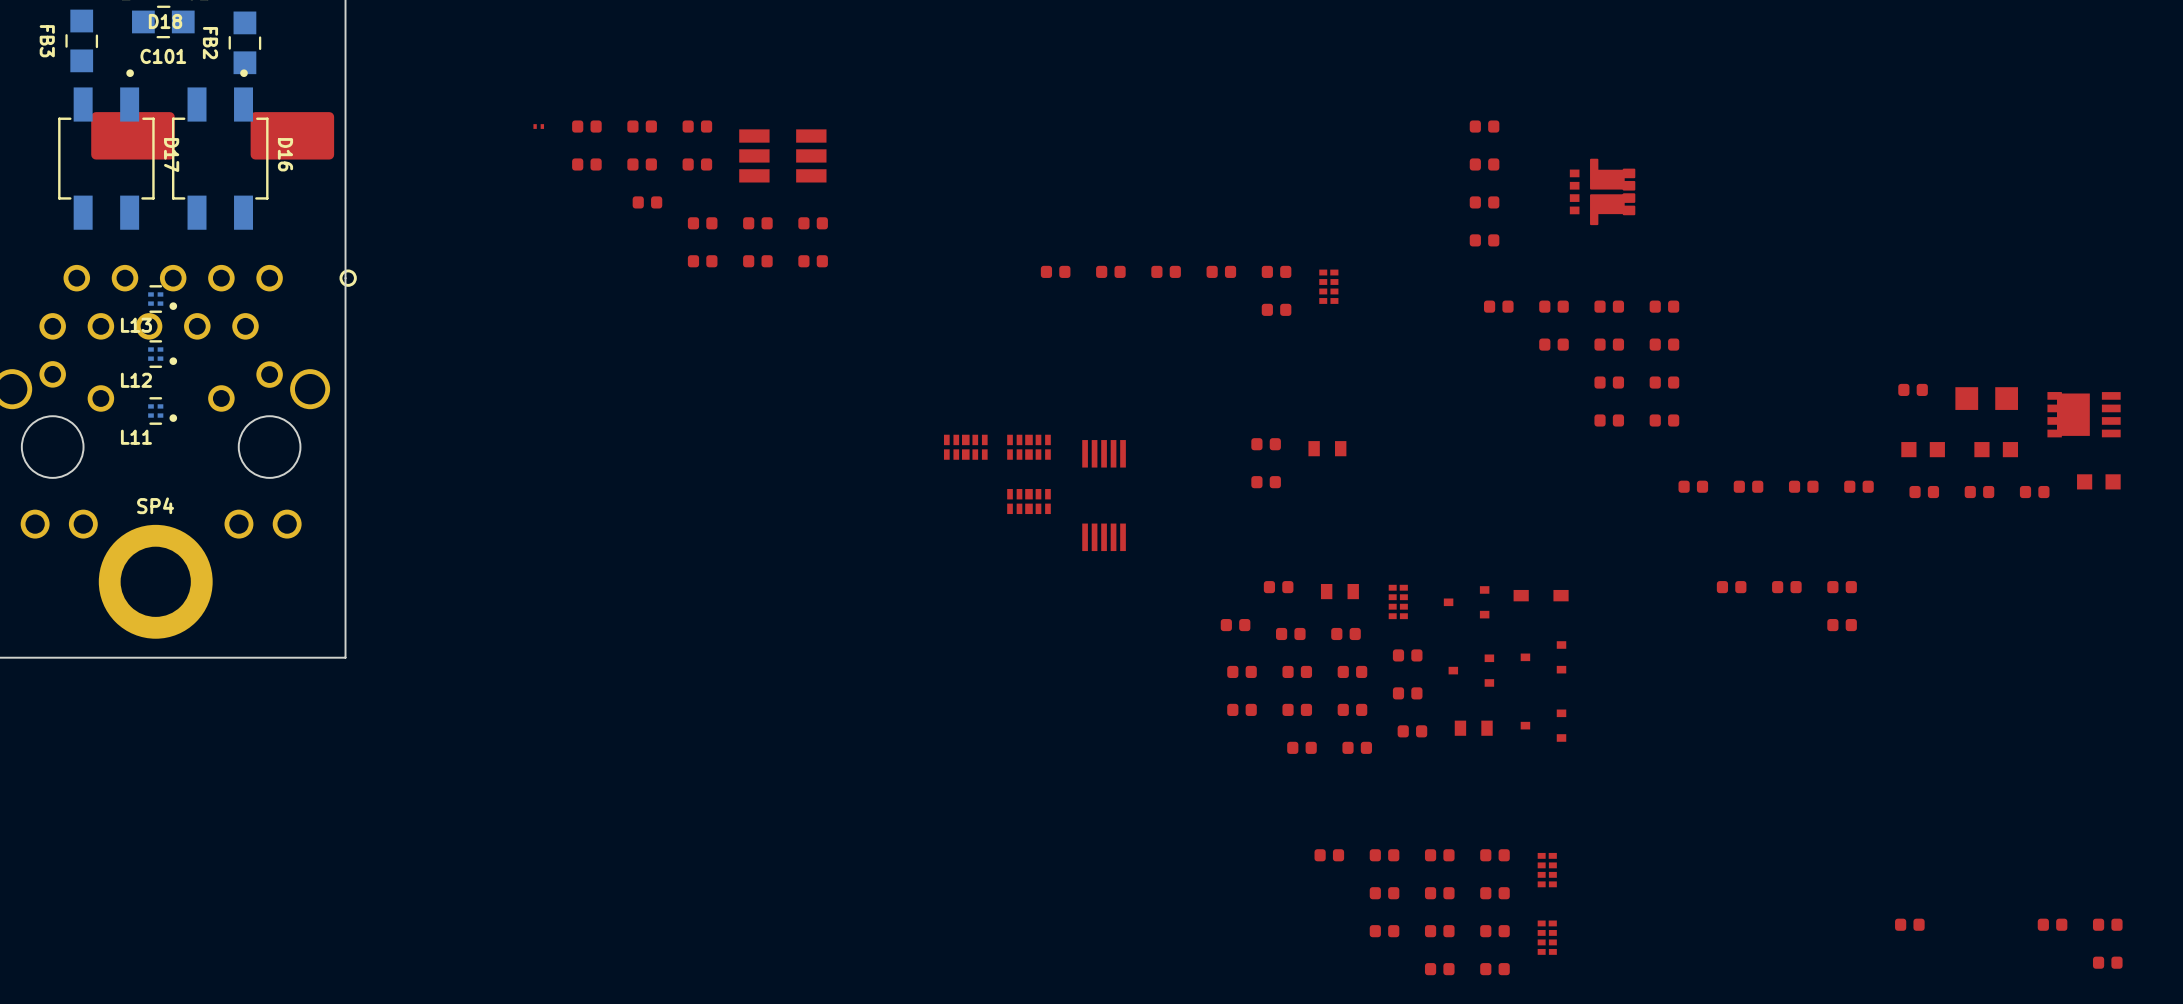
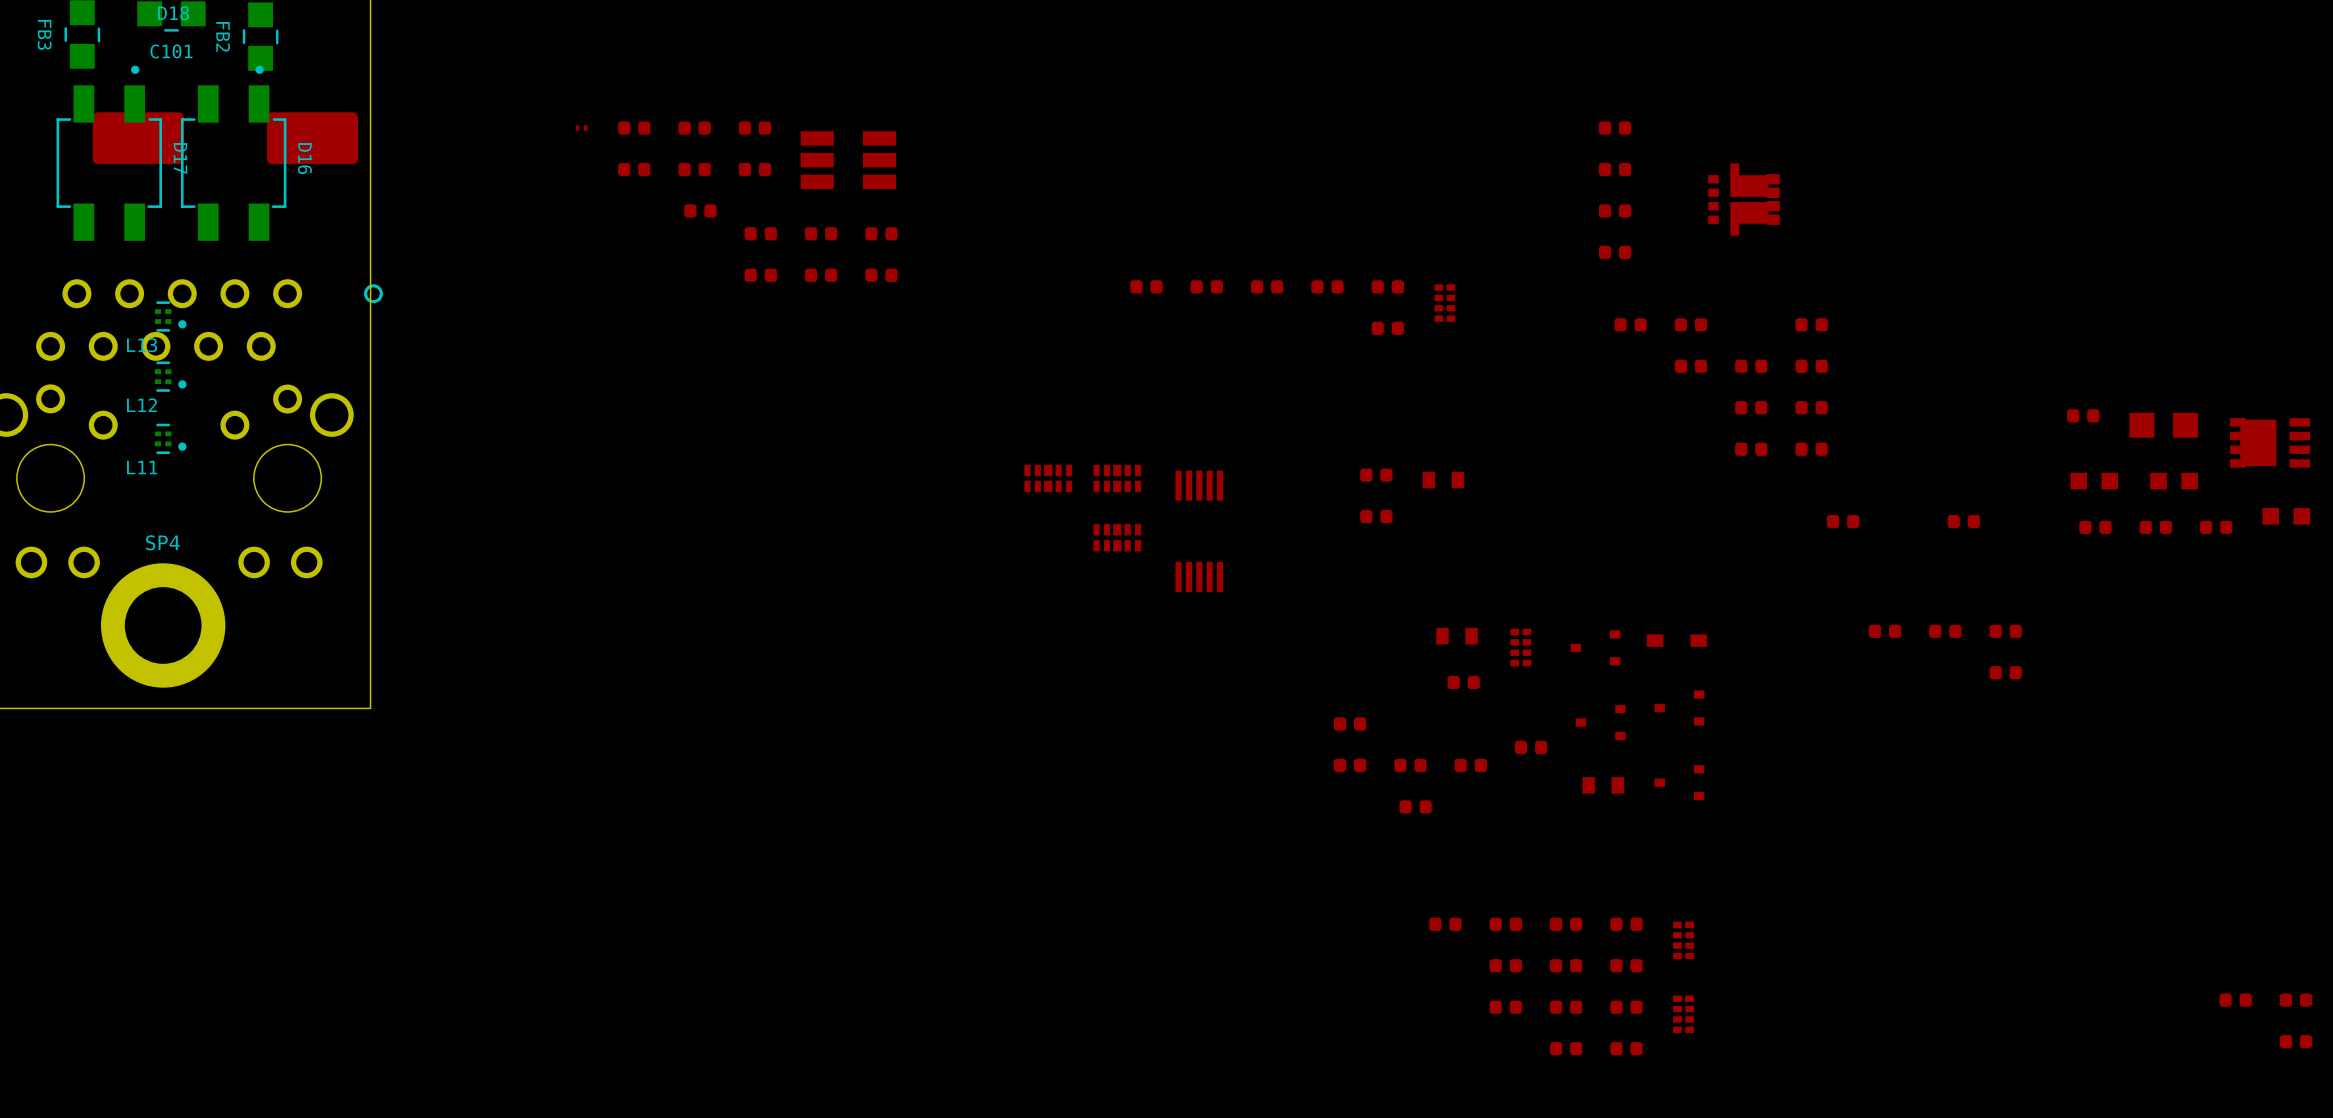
part: (1609, 306) -> none
part: (1748, 486) -> none
part: (1858, 486) -> none
part: (1278, 587) -> none
part: (1235, 625) -> none
part: (1290, 633) -> none
part: (1407, 655) -> none
part: (1297, 671) -> none
part: (1352, 671) -> none
part: (1412, 731) -> none
part: (1357, 747) -> none
part: (1909, 924) -> none

